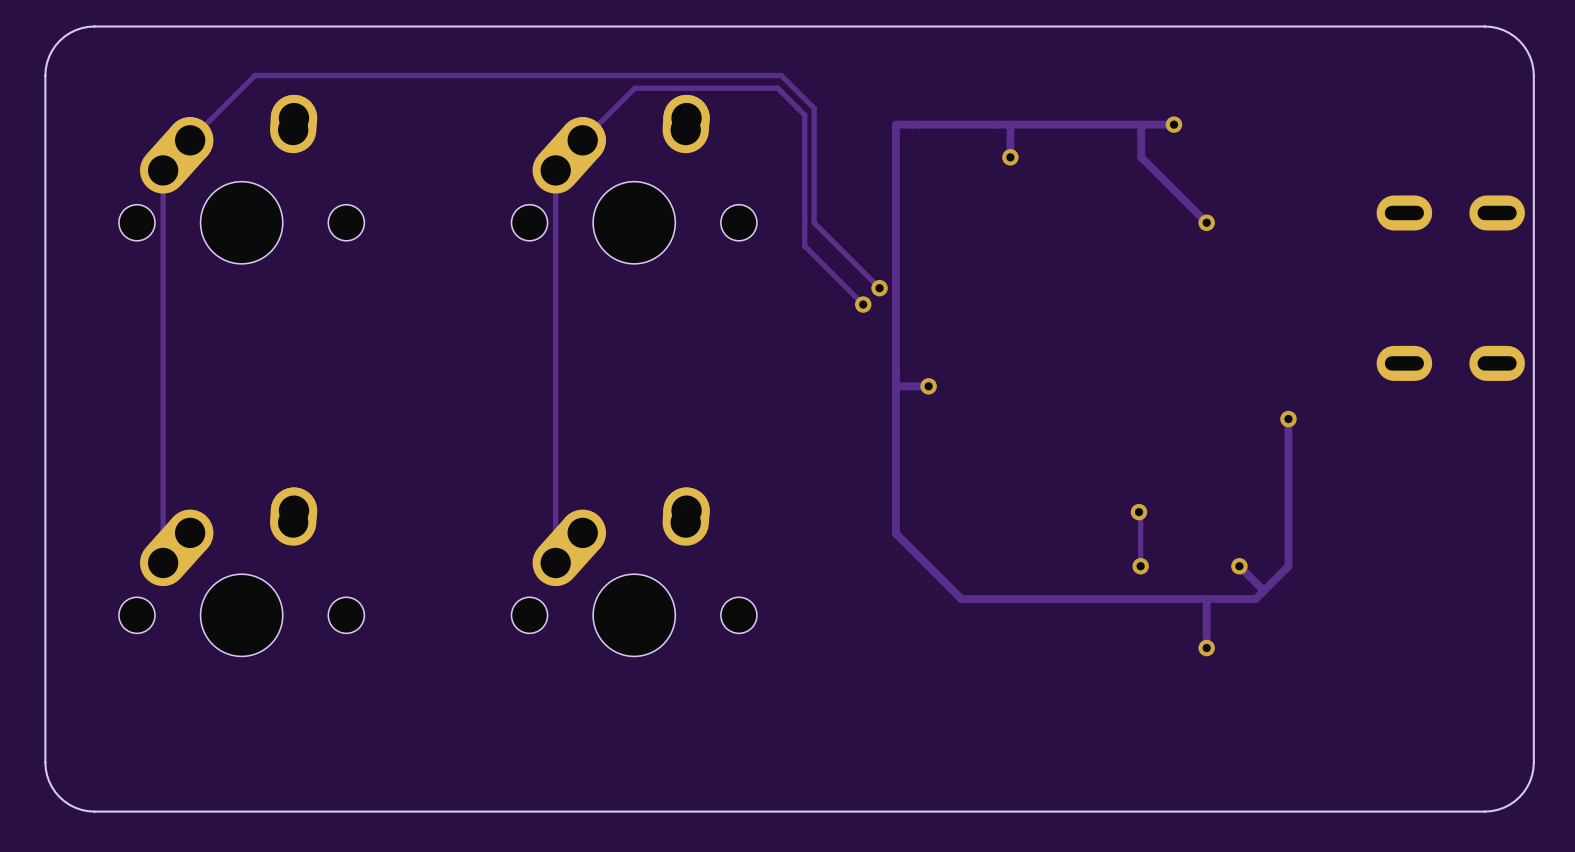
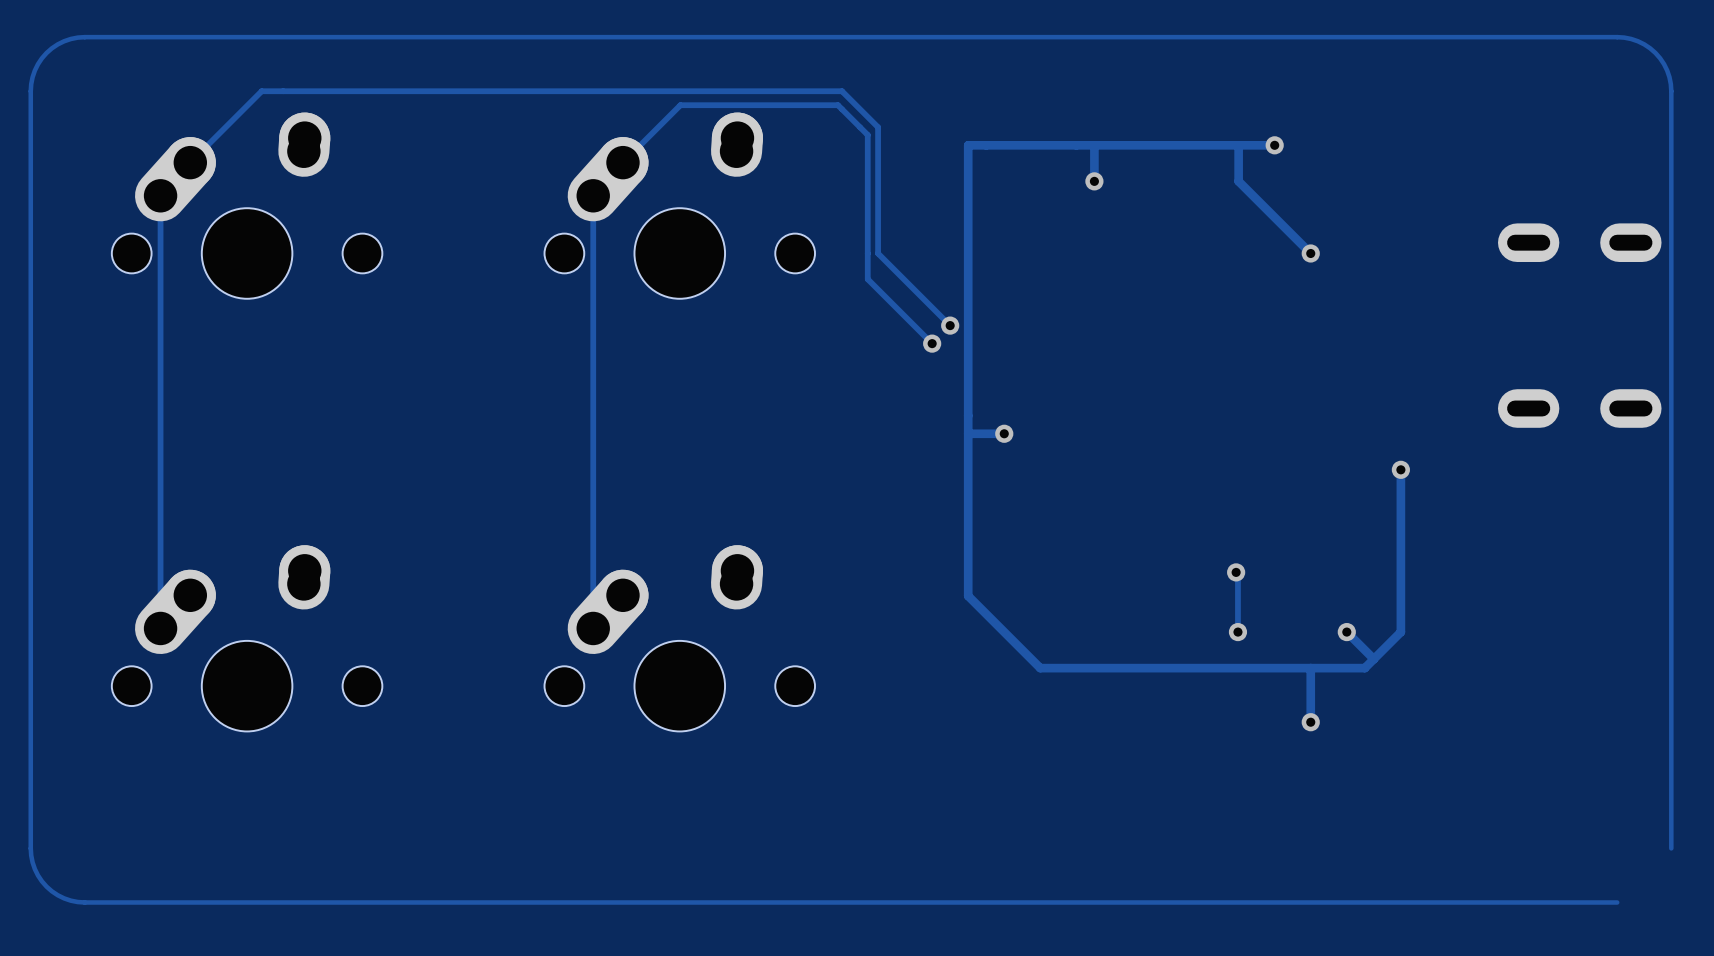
board edge: (94, 26) (1484, 26) (1497, 28) (1509, 33) (1519, 40) (1527, 51) (1532, 62) (1533, 75) (1533, 762) (1532, 775) (1527, 787) (1519, 797) (1509, 805) (1497, 809) (1484, 811) (94, 811) (81, 809) (69, 805) (59, 797) (51, 787) (47, 775) (45, 762) (45, 75) (49, 56) (59, 40) (75, 30) (94, 26) -> none
track: none -> (1671, 848) (1671, 91) (1669, 77) (1664, 64) (1650, 48) (1637, 41) (1617, 37) (84, 37) (70, 38) (57, 44) (46, 52) (38, 64) (32, 77) (30, 91) (30, 848) (32, 862) (38, 875) (46, 886) (57, 895) (70, 900) (84, 902) (1617, 902)

